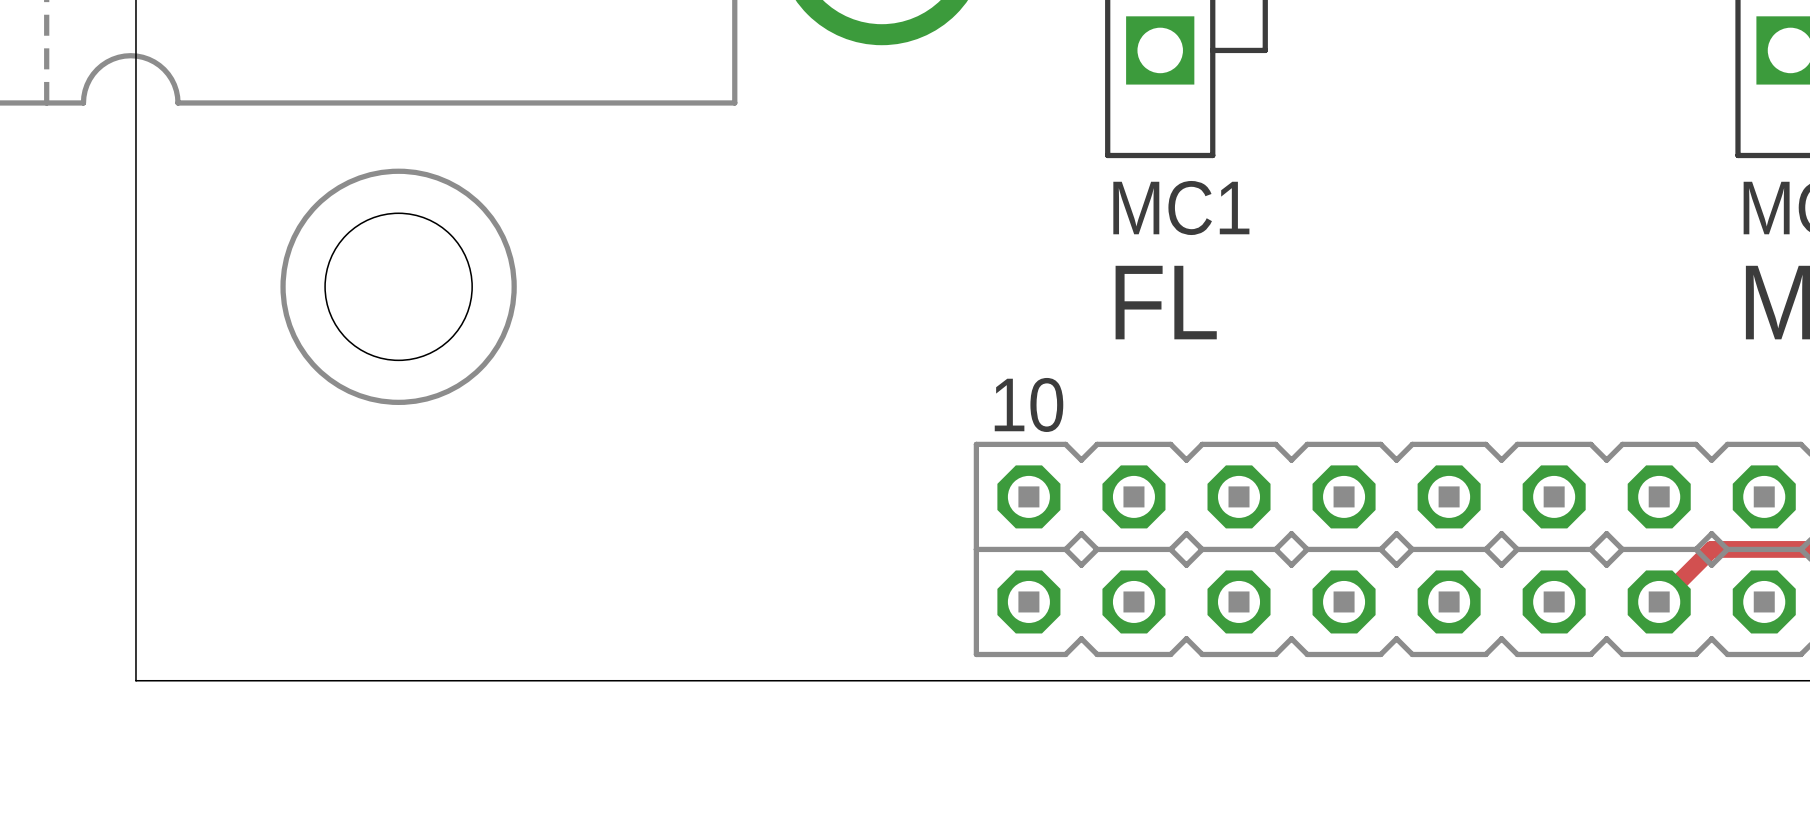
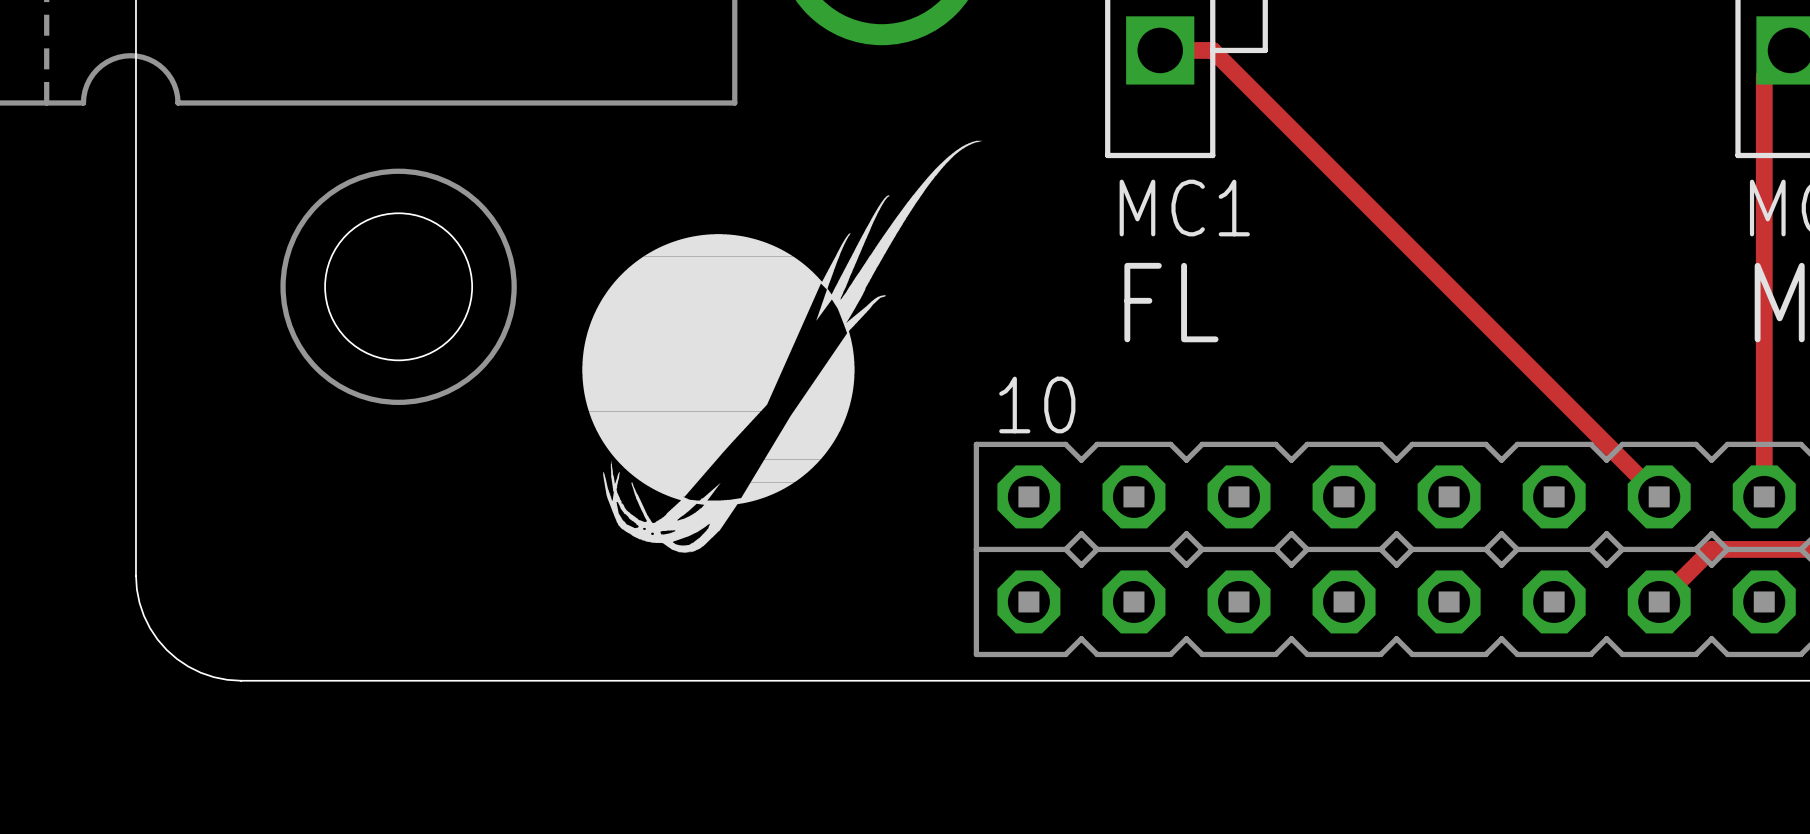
track: none -> (1160, 50) (1212, 50) (1659, 496)
track: none -> (1790, 50) (1764, 76) (1764, 496)
drawing: none -> [582, 140, 982, 554]
board edge: (135, 575) (135, 680) (241, 680) -> (135, 575) (139, 602) (143, 615) (157, 639) (166, 649) (177, 659) (200, 672) (213, 677) (241, 680)

